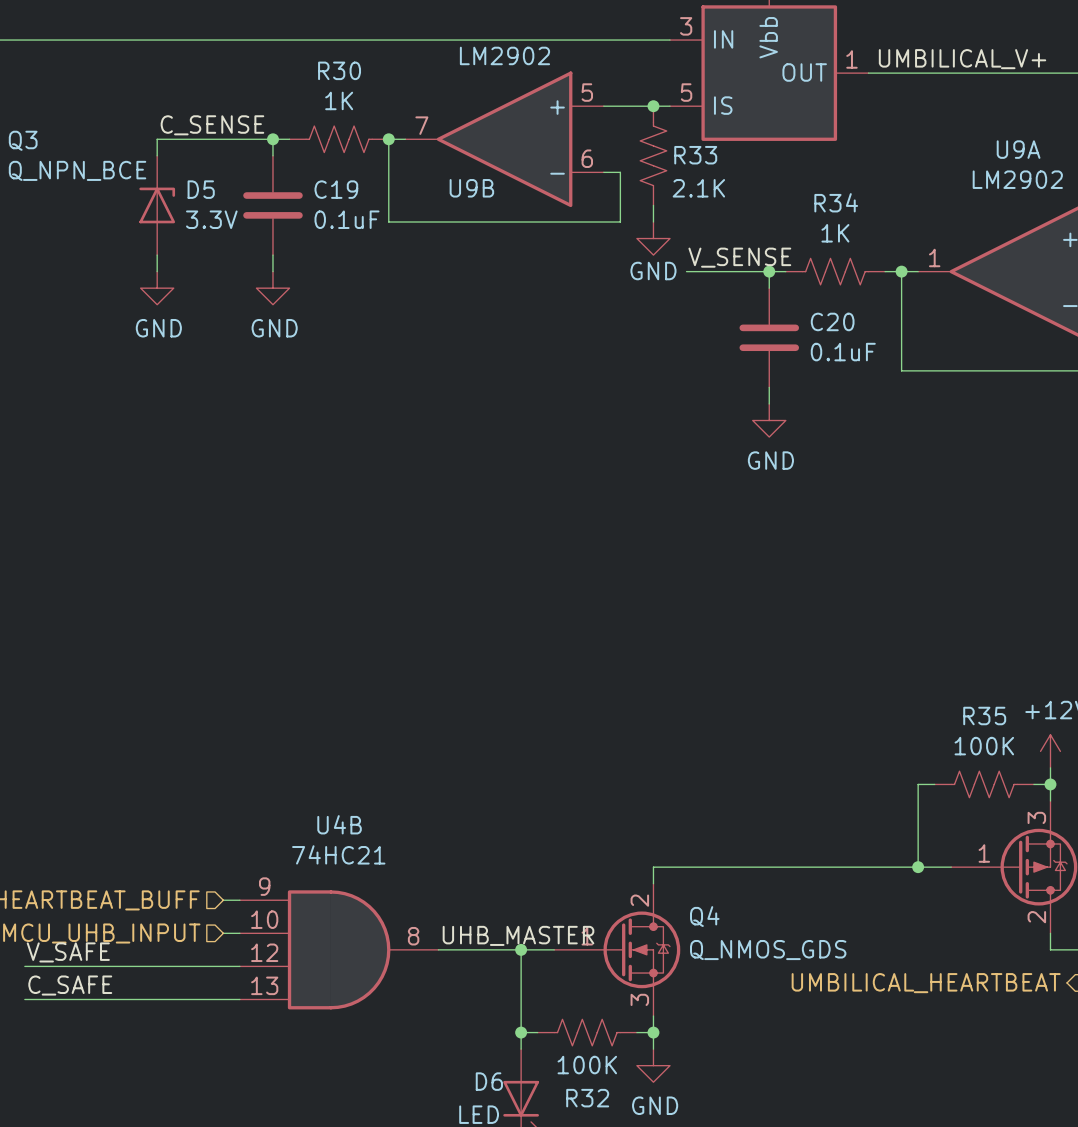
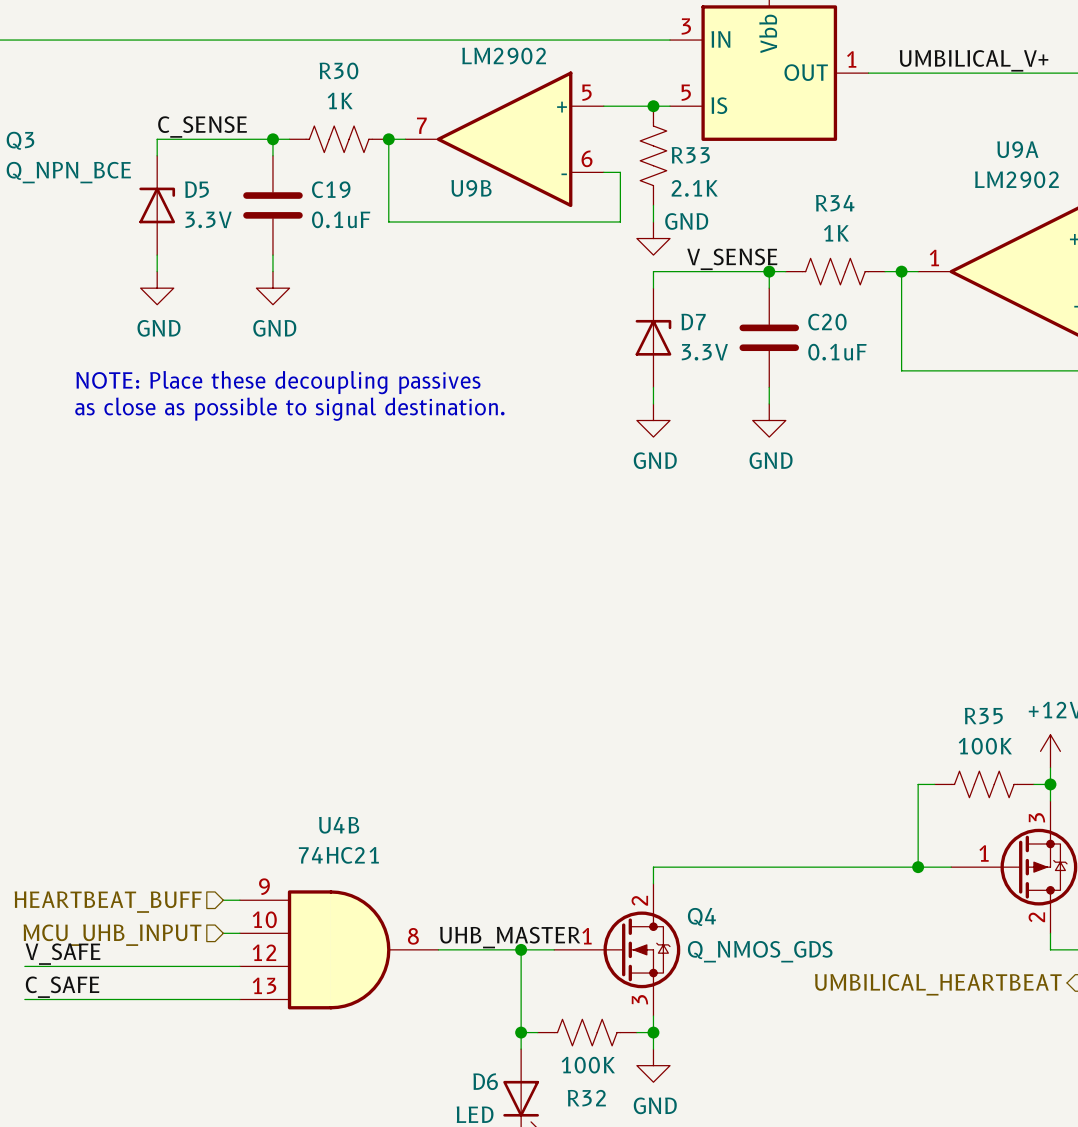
power symbol text position: GND (653, 271) -> GND (686, 221)
wire: none -> (686, 271) (653, 271) (653, 288)
D7: none -> 3.3V (653, 337)
text: none -> NOTE: Place these decoupling passives (278, 382)
wire: none -> (653, 387) (653, 403)
text: none -> as close as possible to signal destination. (289, 409)
power symbol: none -> GND (653, 420)

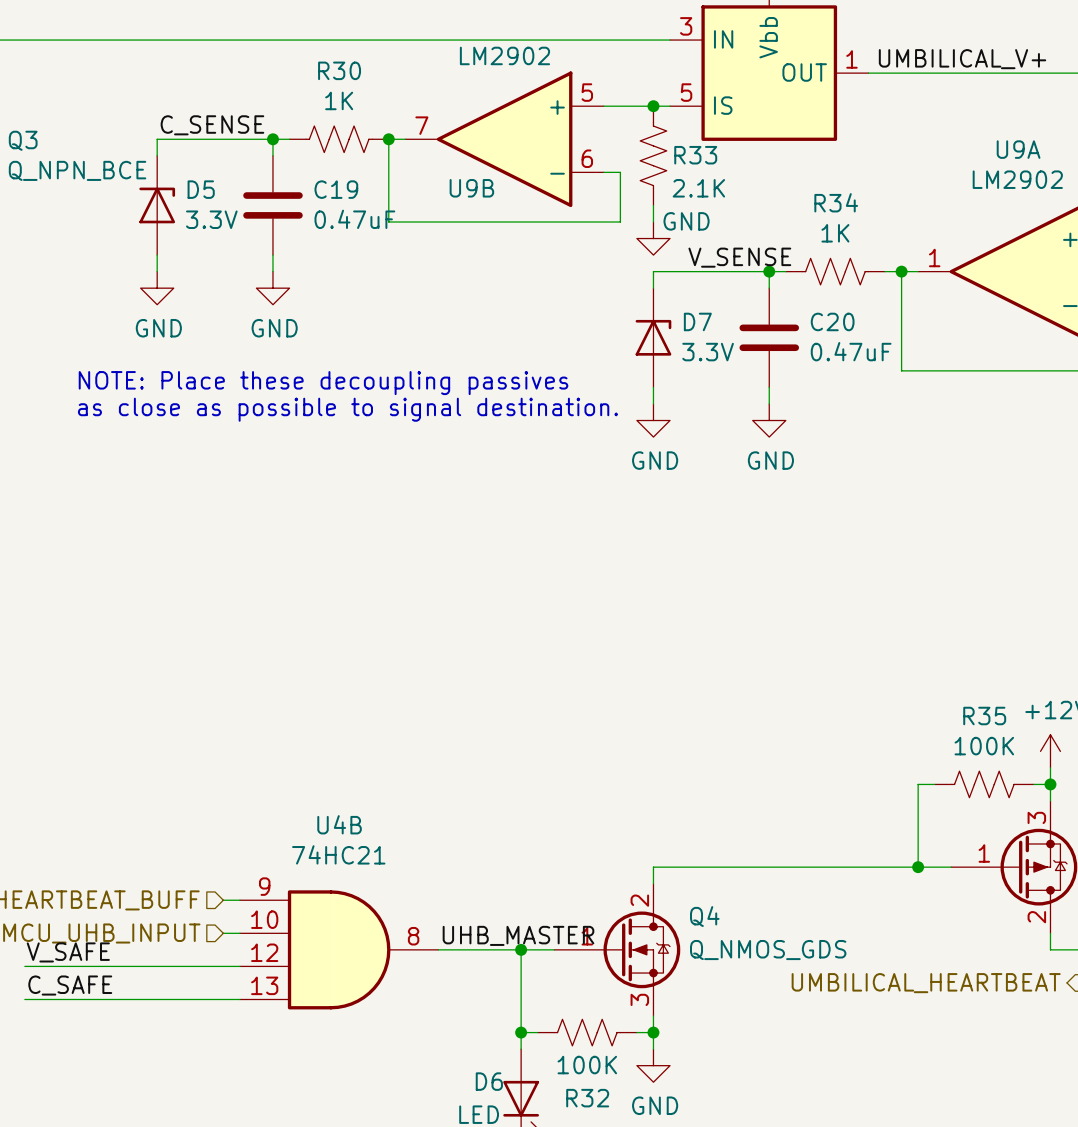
C19 value: 0.1uF (341, 219) -> 0.47uF (354, 219)
C20 value: 0.1uF (837, 352) -> 0.47uF (851, 351)

